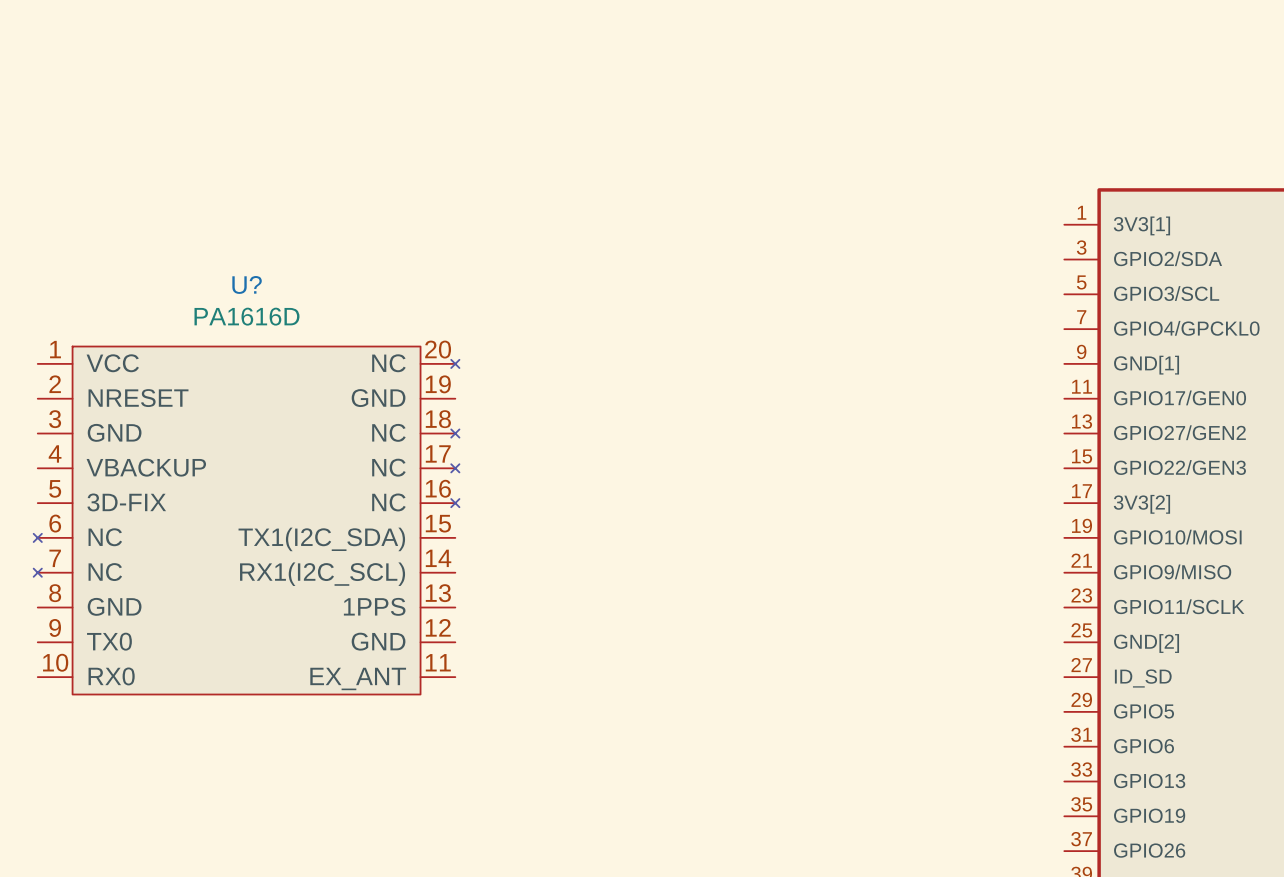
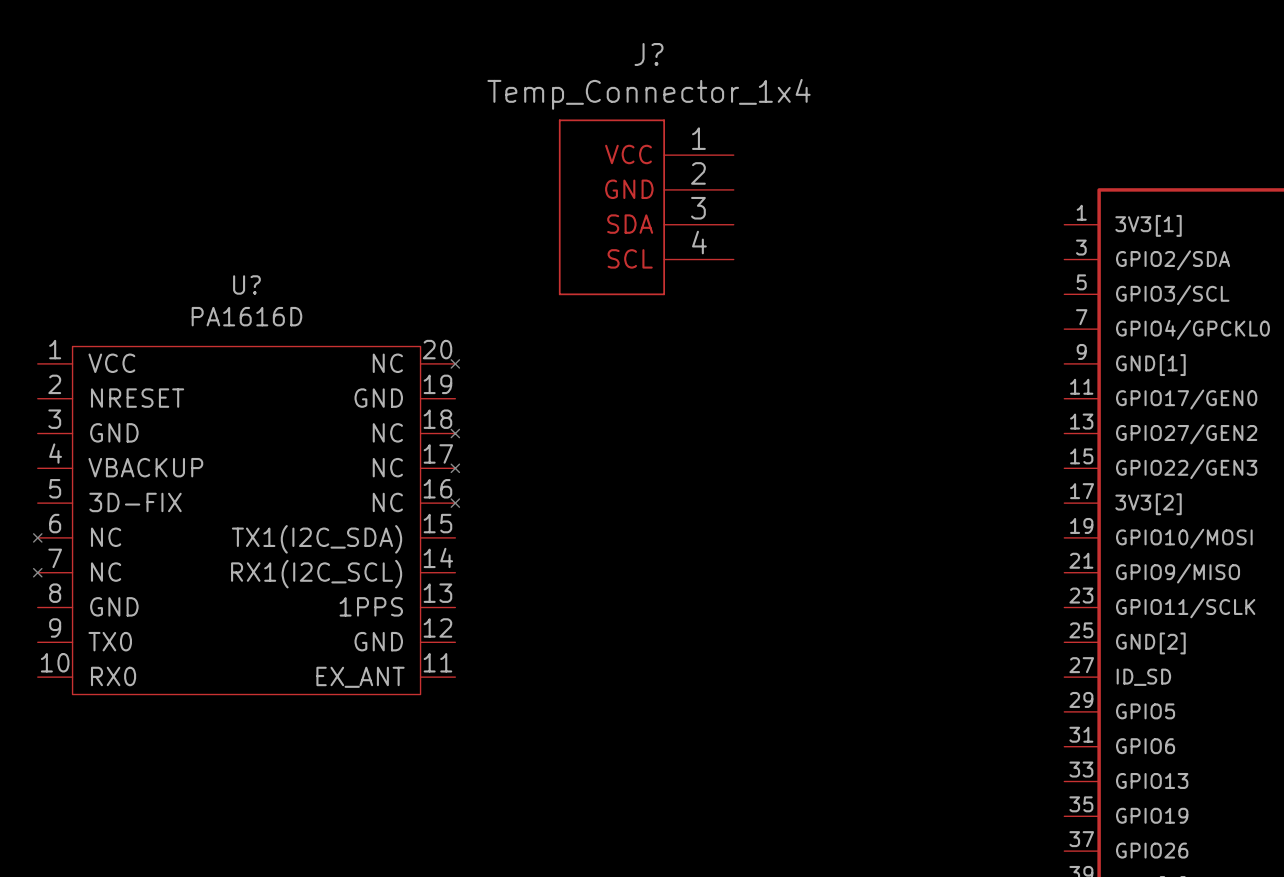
J?: none -> Temp_Connector_1x4 (646, 207)

